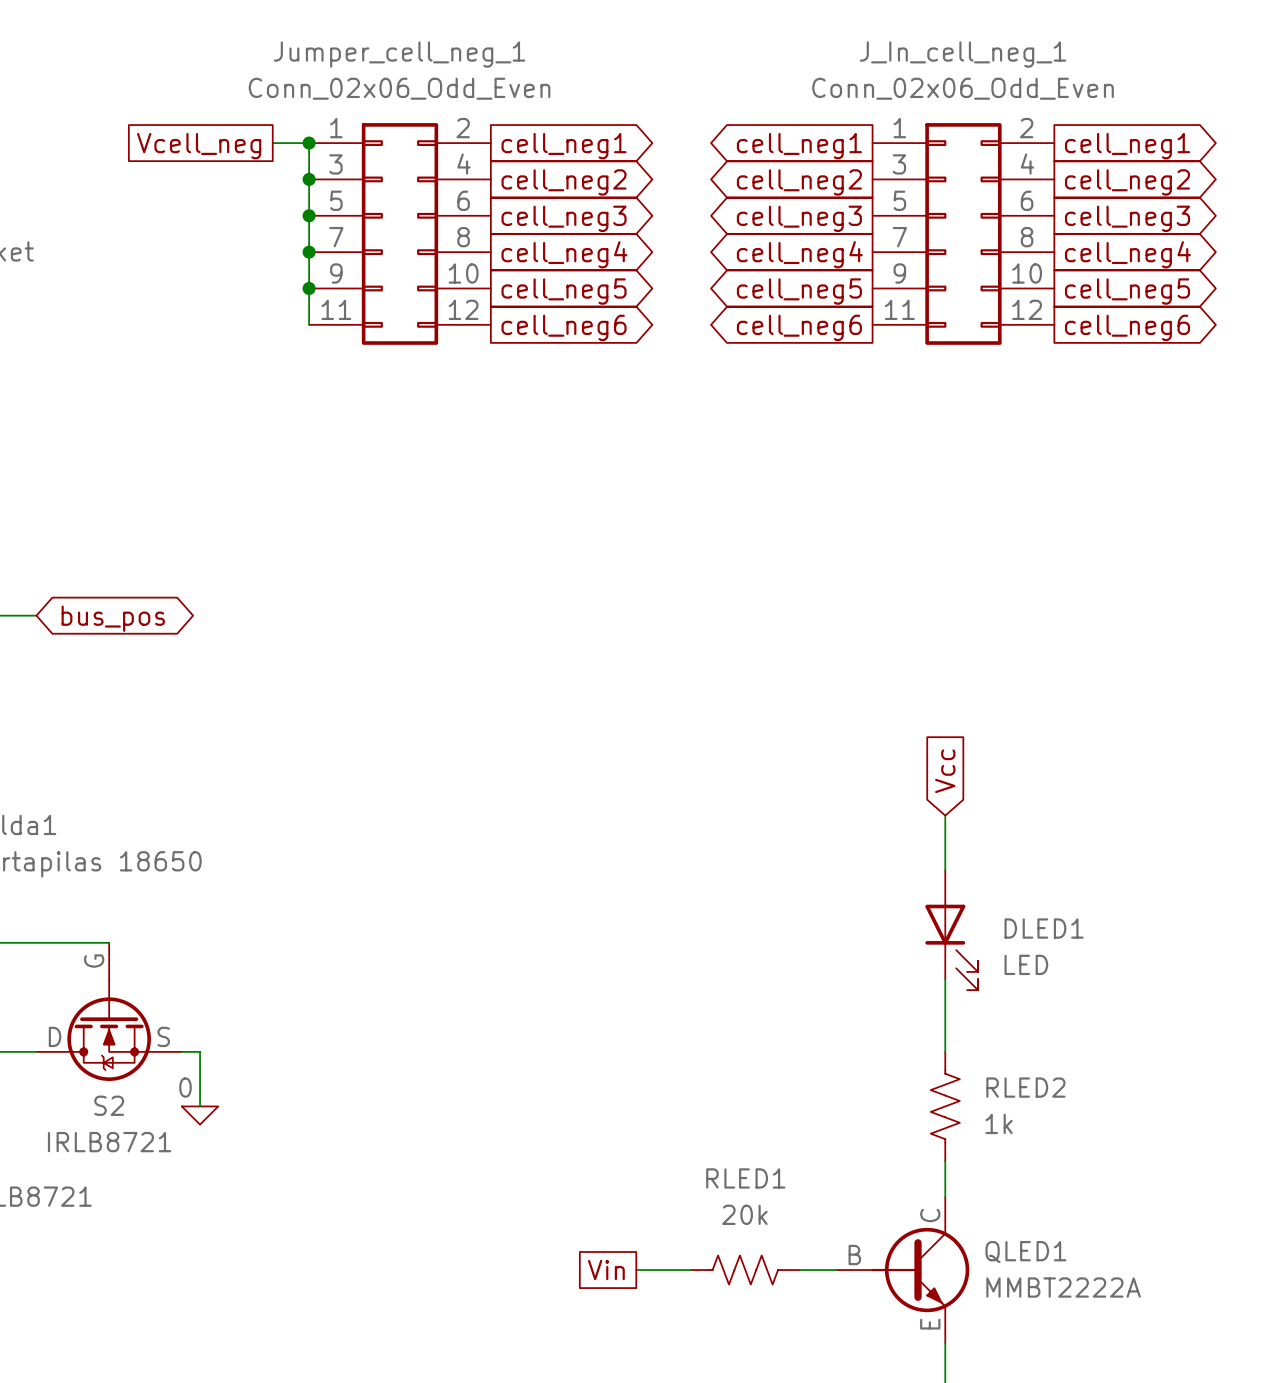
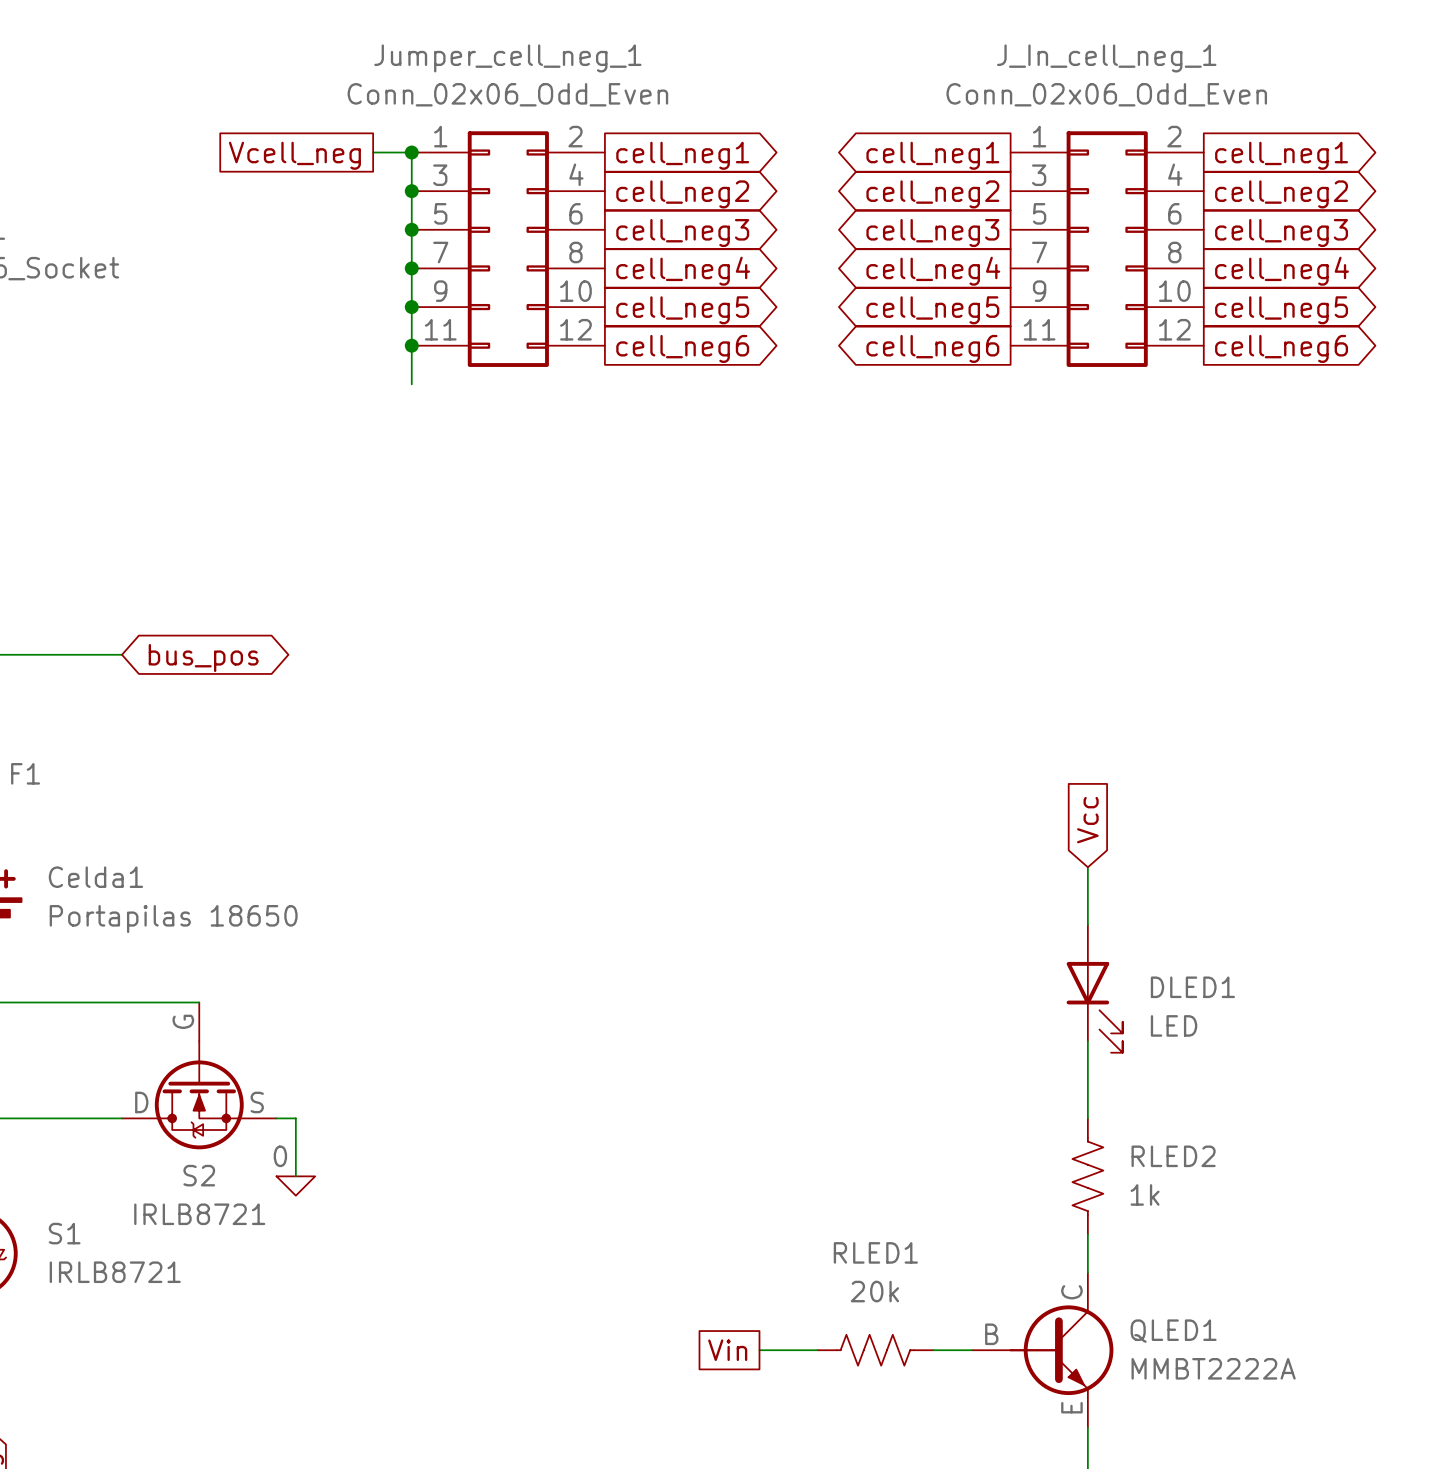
wire: none -> (411, 345) (411, 384)
junction: none -> (411, 345)

